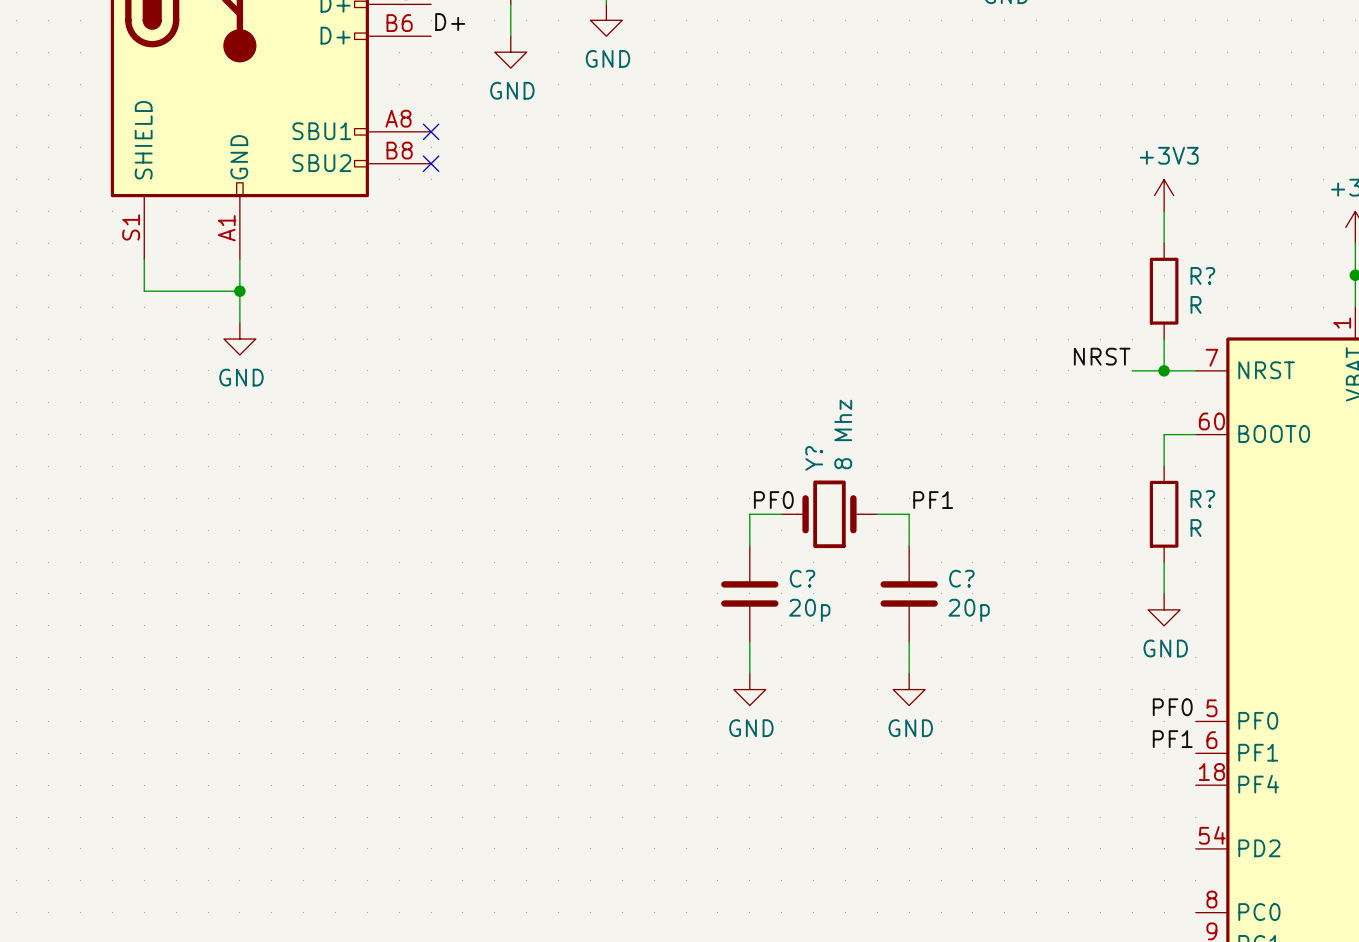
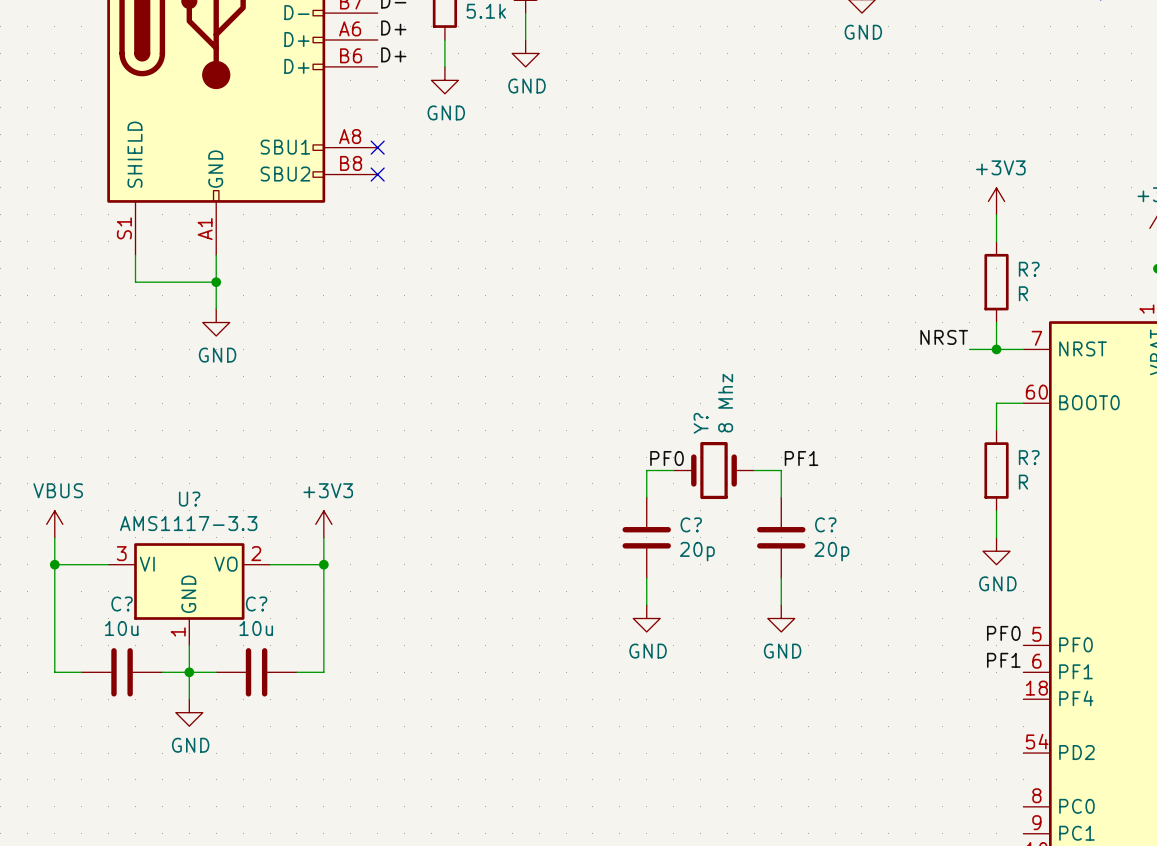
power symbol: none -> VBUS (54, 524)
power symbol: none -> +3V3 (323, 524)
wire: none -> (54, 537) (54, 672) (81, 672)
wire: none -> (323, 537) (323, 672) (296, 672)
wire: none -> (54, 564) (108, 564)
junction: none -> (54, 564)
wire: none -> (270, 564) (323, 564)
junction: none -> (323, 564)
U?: none -> AMS1117-3.3 (189, 594)
wire: none -> (189, 645) (189, 699)
C?: none -> 10u (122, 672)
wire: none -> (162, 672) (216, 672)
junction: none -> (189, 672)
C?: none -> 10u (256, 672)
power symbol: none -> GND (189, 712)

